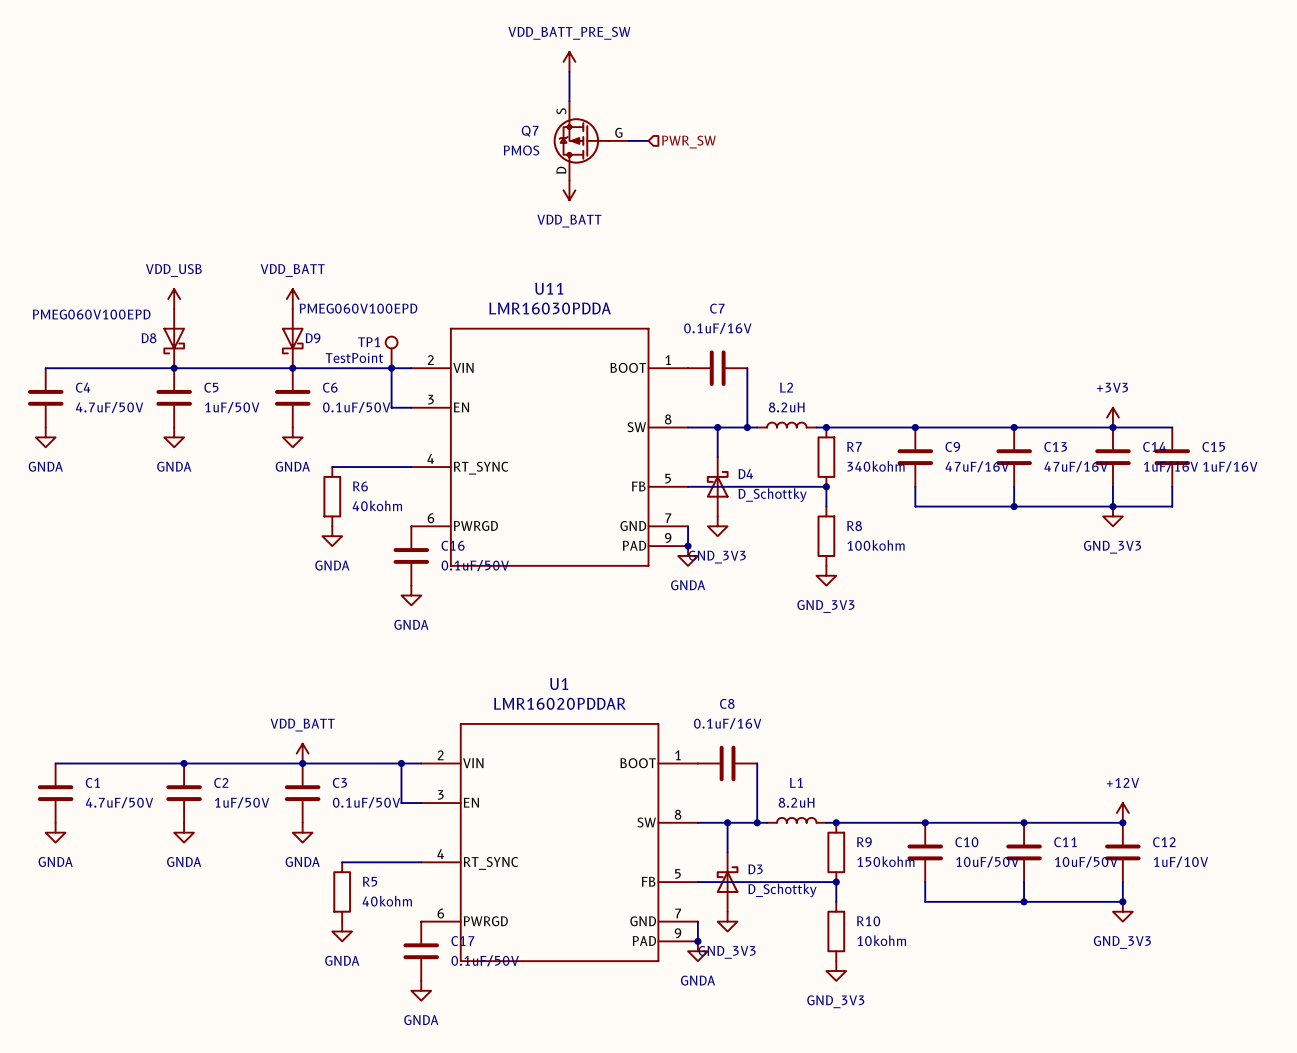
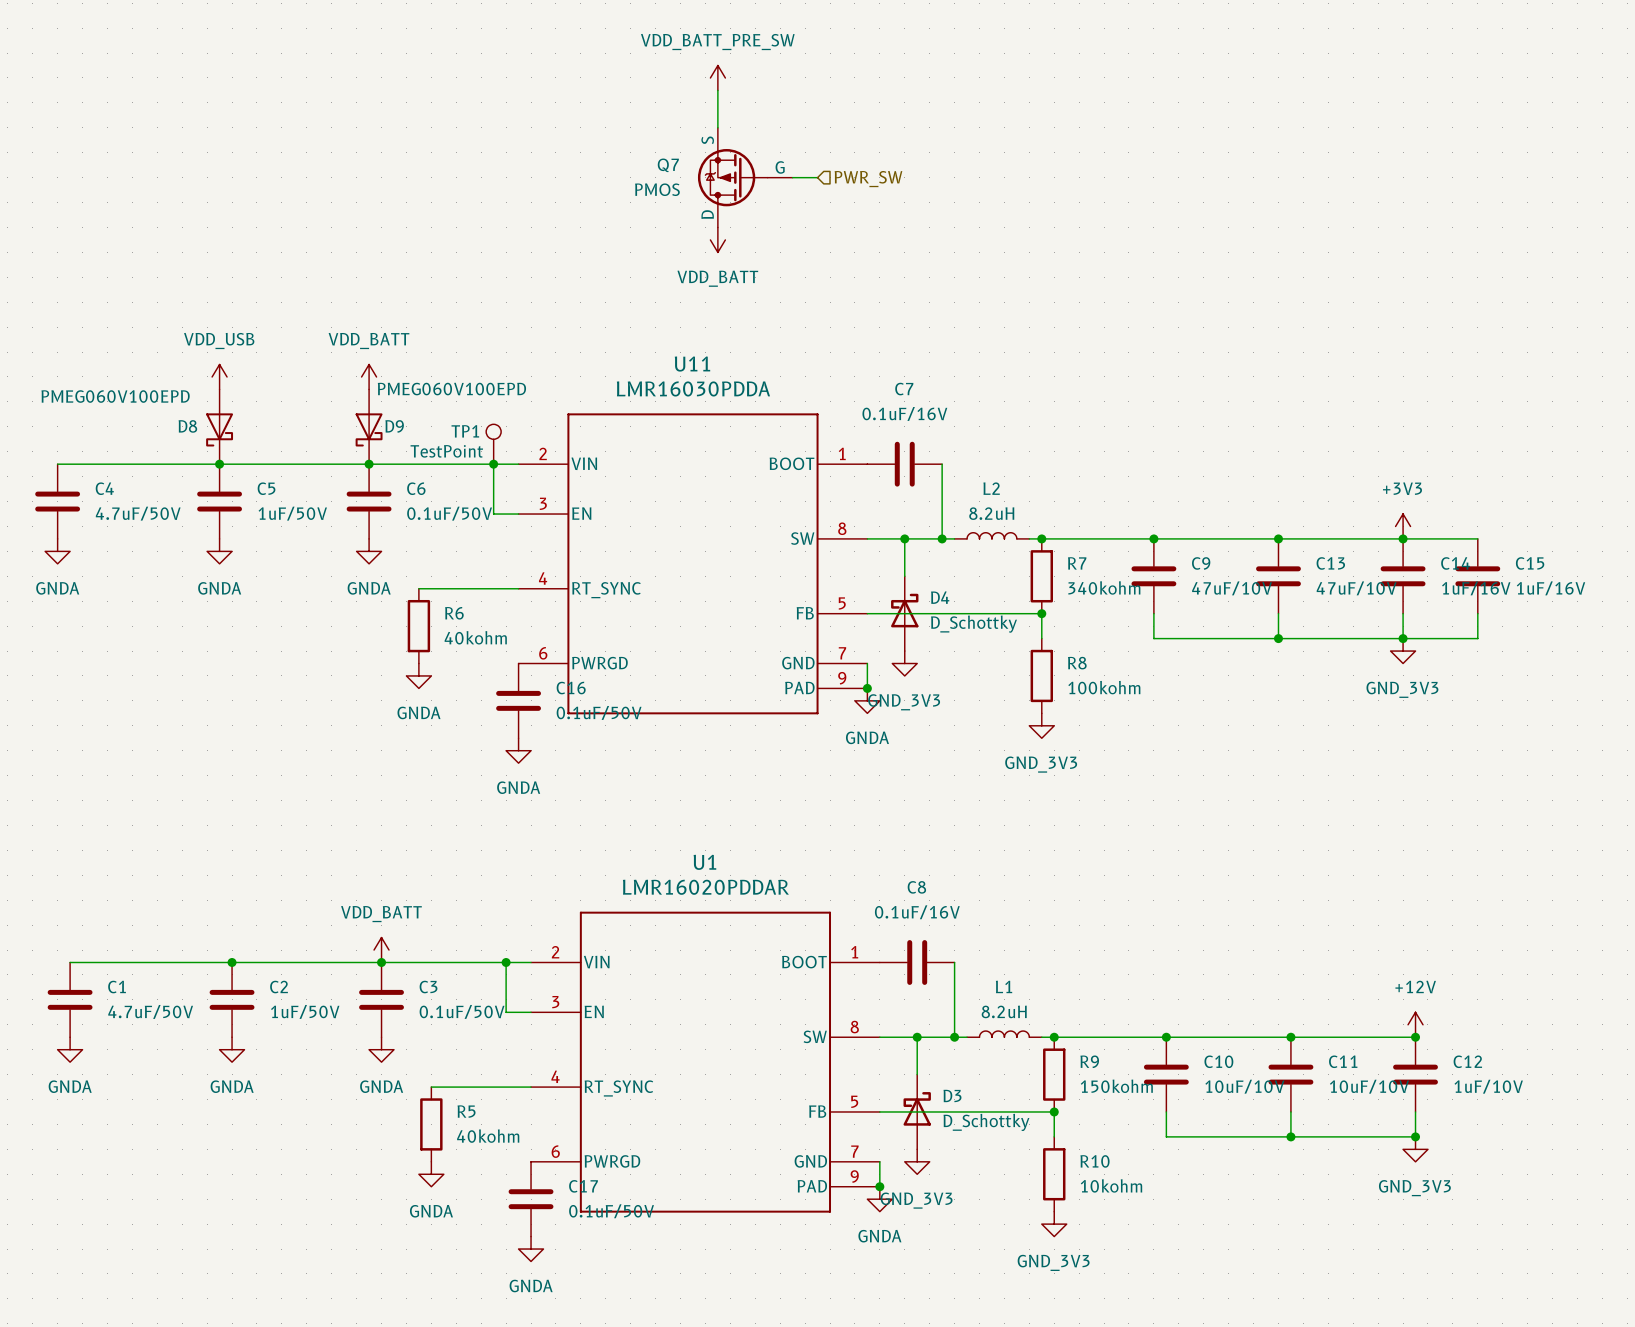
C9 value: 47uF/16V (977, 466) -> 47uF/10V (1232, 588)
C13 value: 47uF/16V (1076, 466) -> 47uF/10V (1356, 588)
C10 value: 10uF/50V (987, 862) -> 10uF/10V (1244, 1086)
C11 value: 10uF/50V (1086, 862) -> 10uF/10V (1369, 1086)

